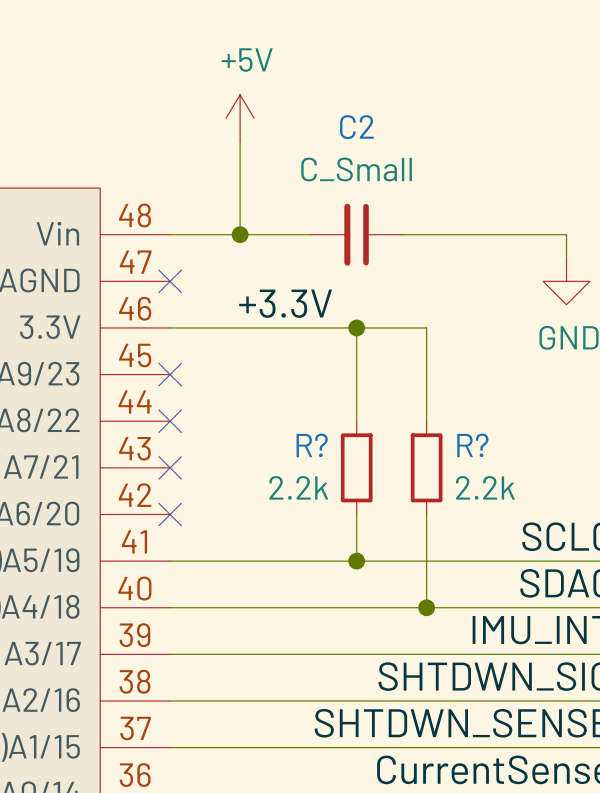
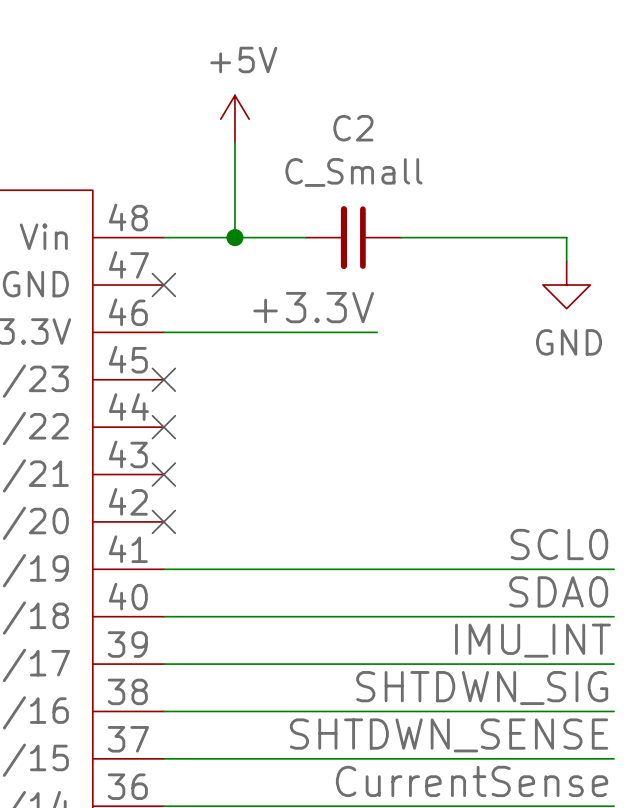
label position: +3.3V (285, 303) -> +3.3V (313, 307)
wire: (356, 327) (356, 421) -> none
junction: (356, 327) -> none
wire: (380, 327) (426, 327) (426, 421) -> none
R?: 2.2k (356, 467) -> none
R?: 2.2k (426, 467) -> none
wire: (356, 514) (356, 561) -> none
wire: (426, 514) (426, 607) -> none
junction: (356, 561) -> none
junction: (426, 607) -> none

